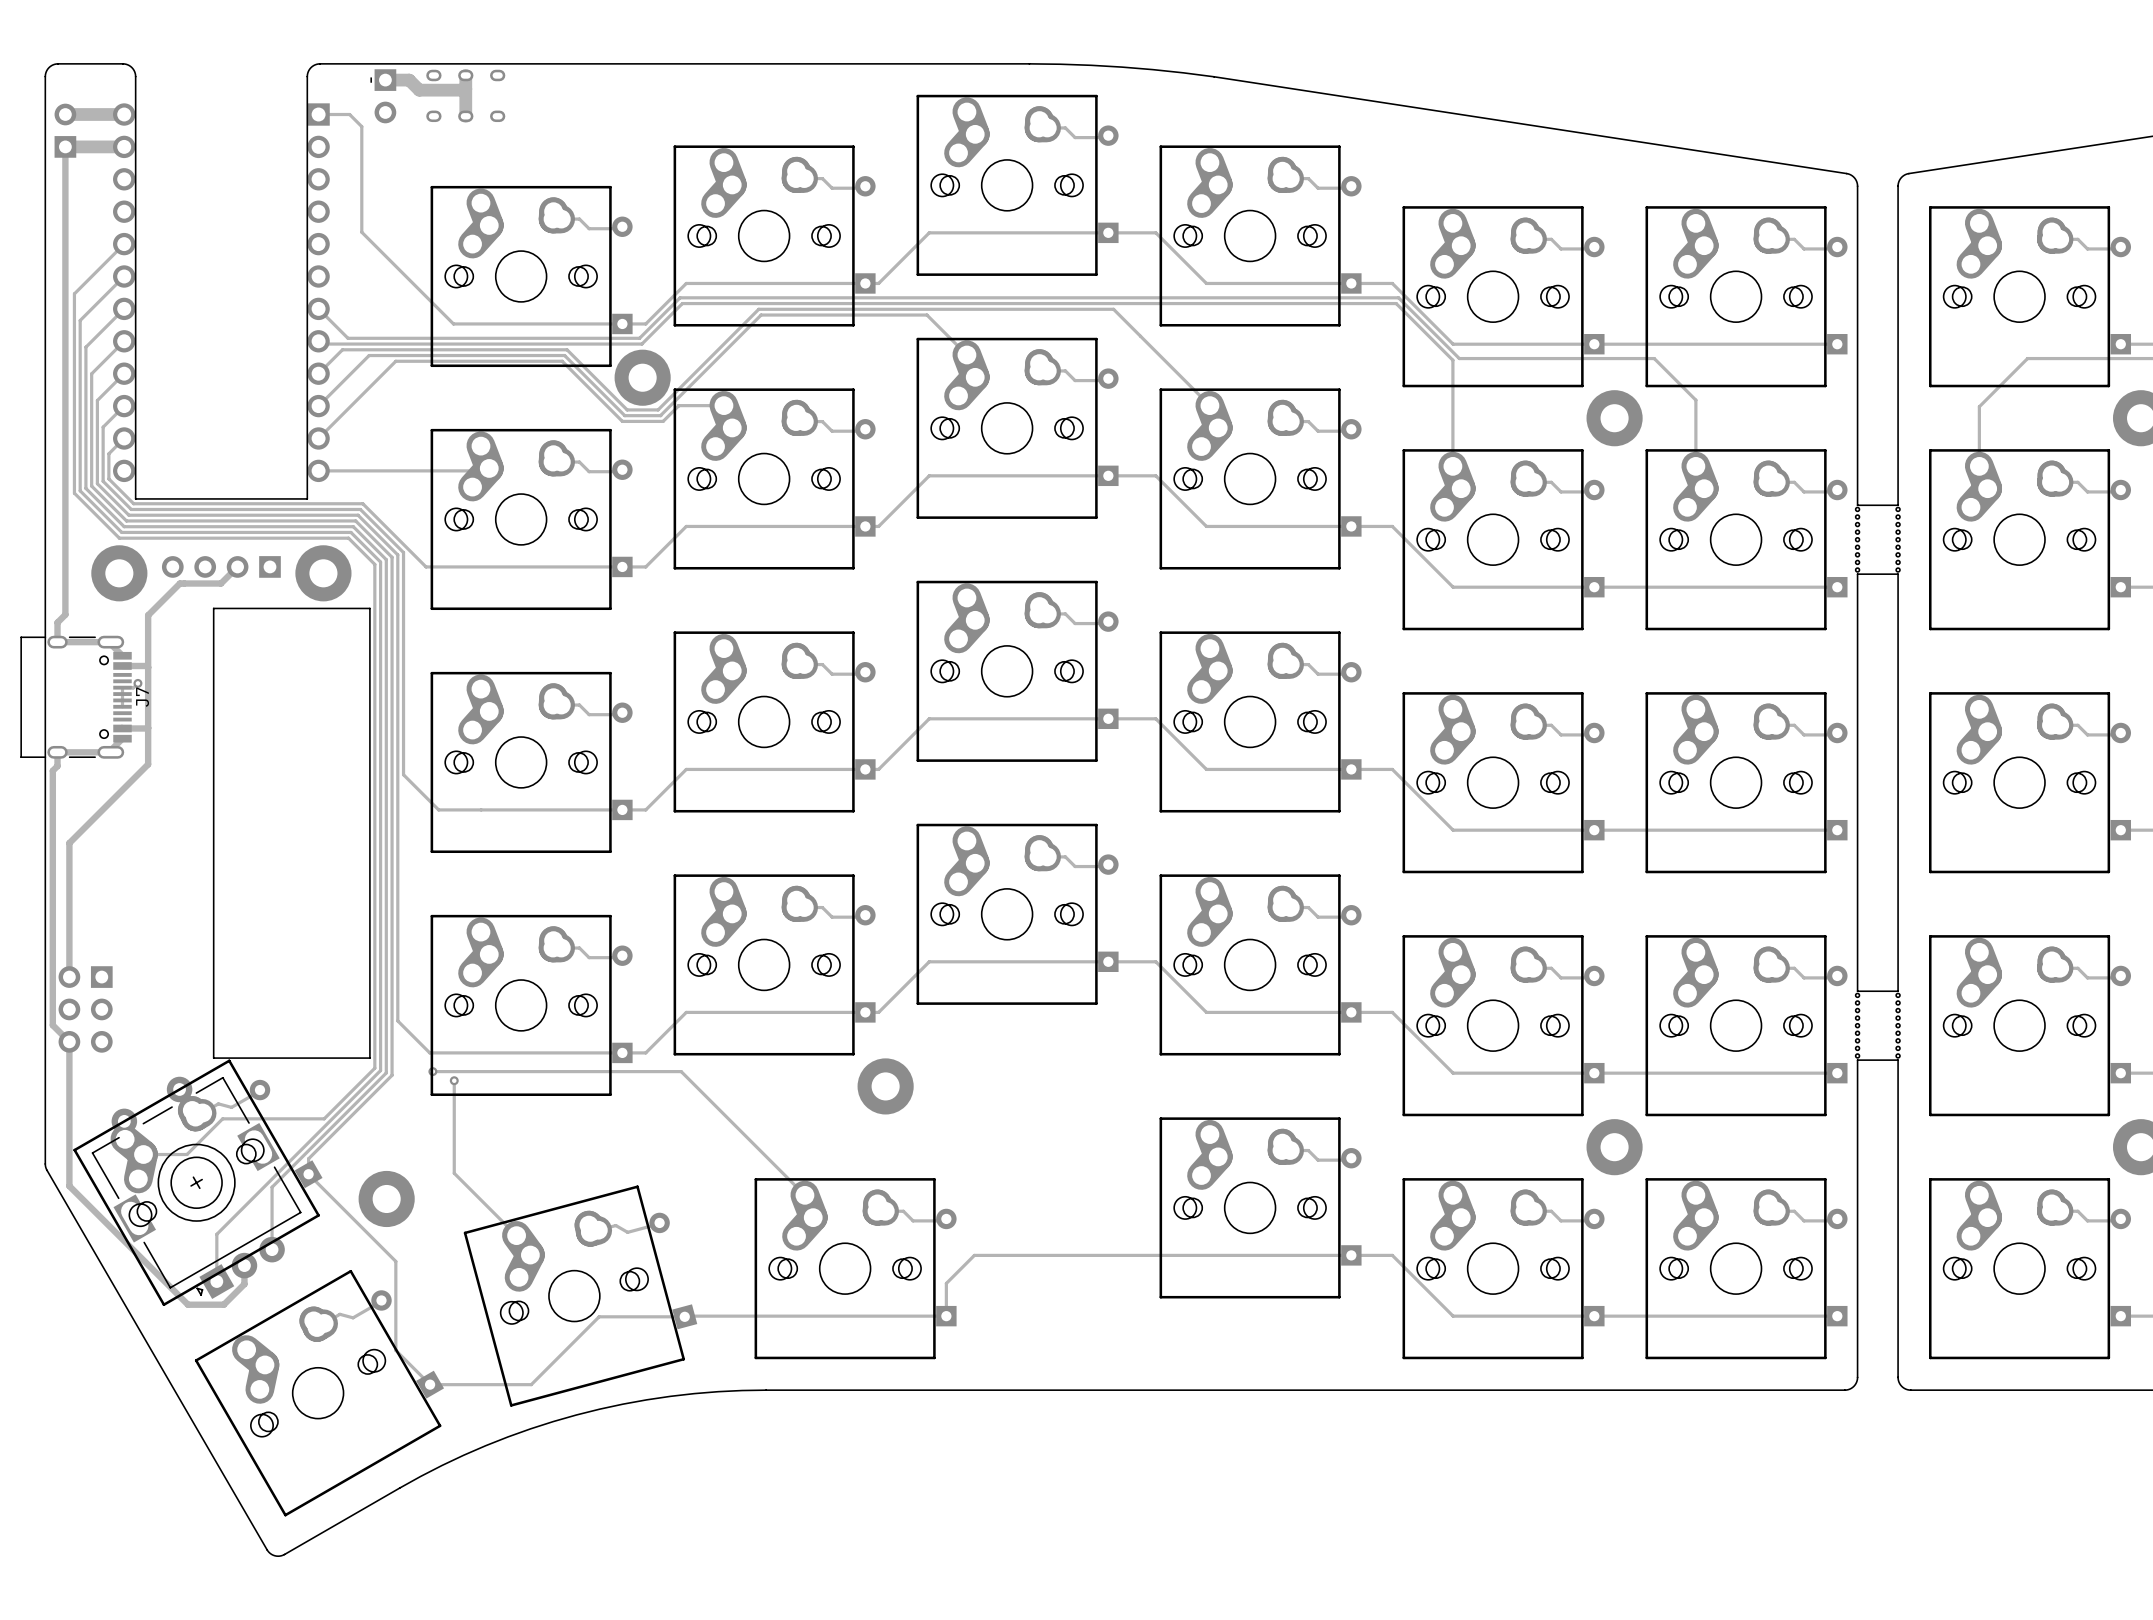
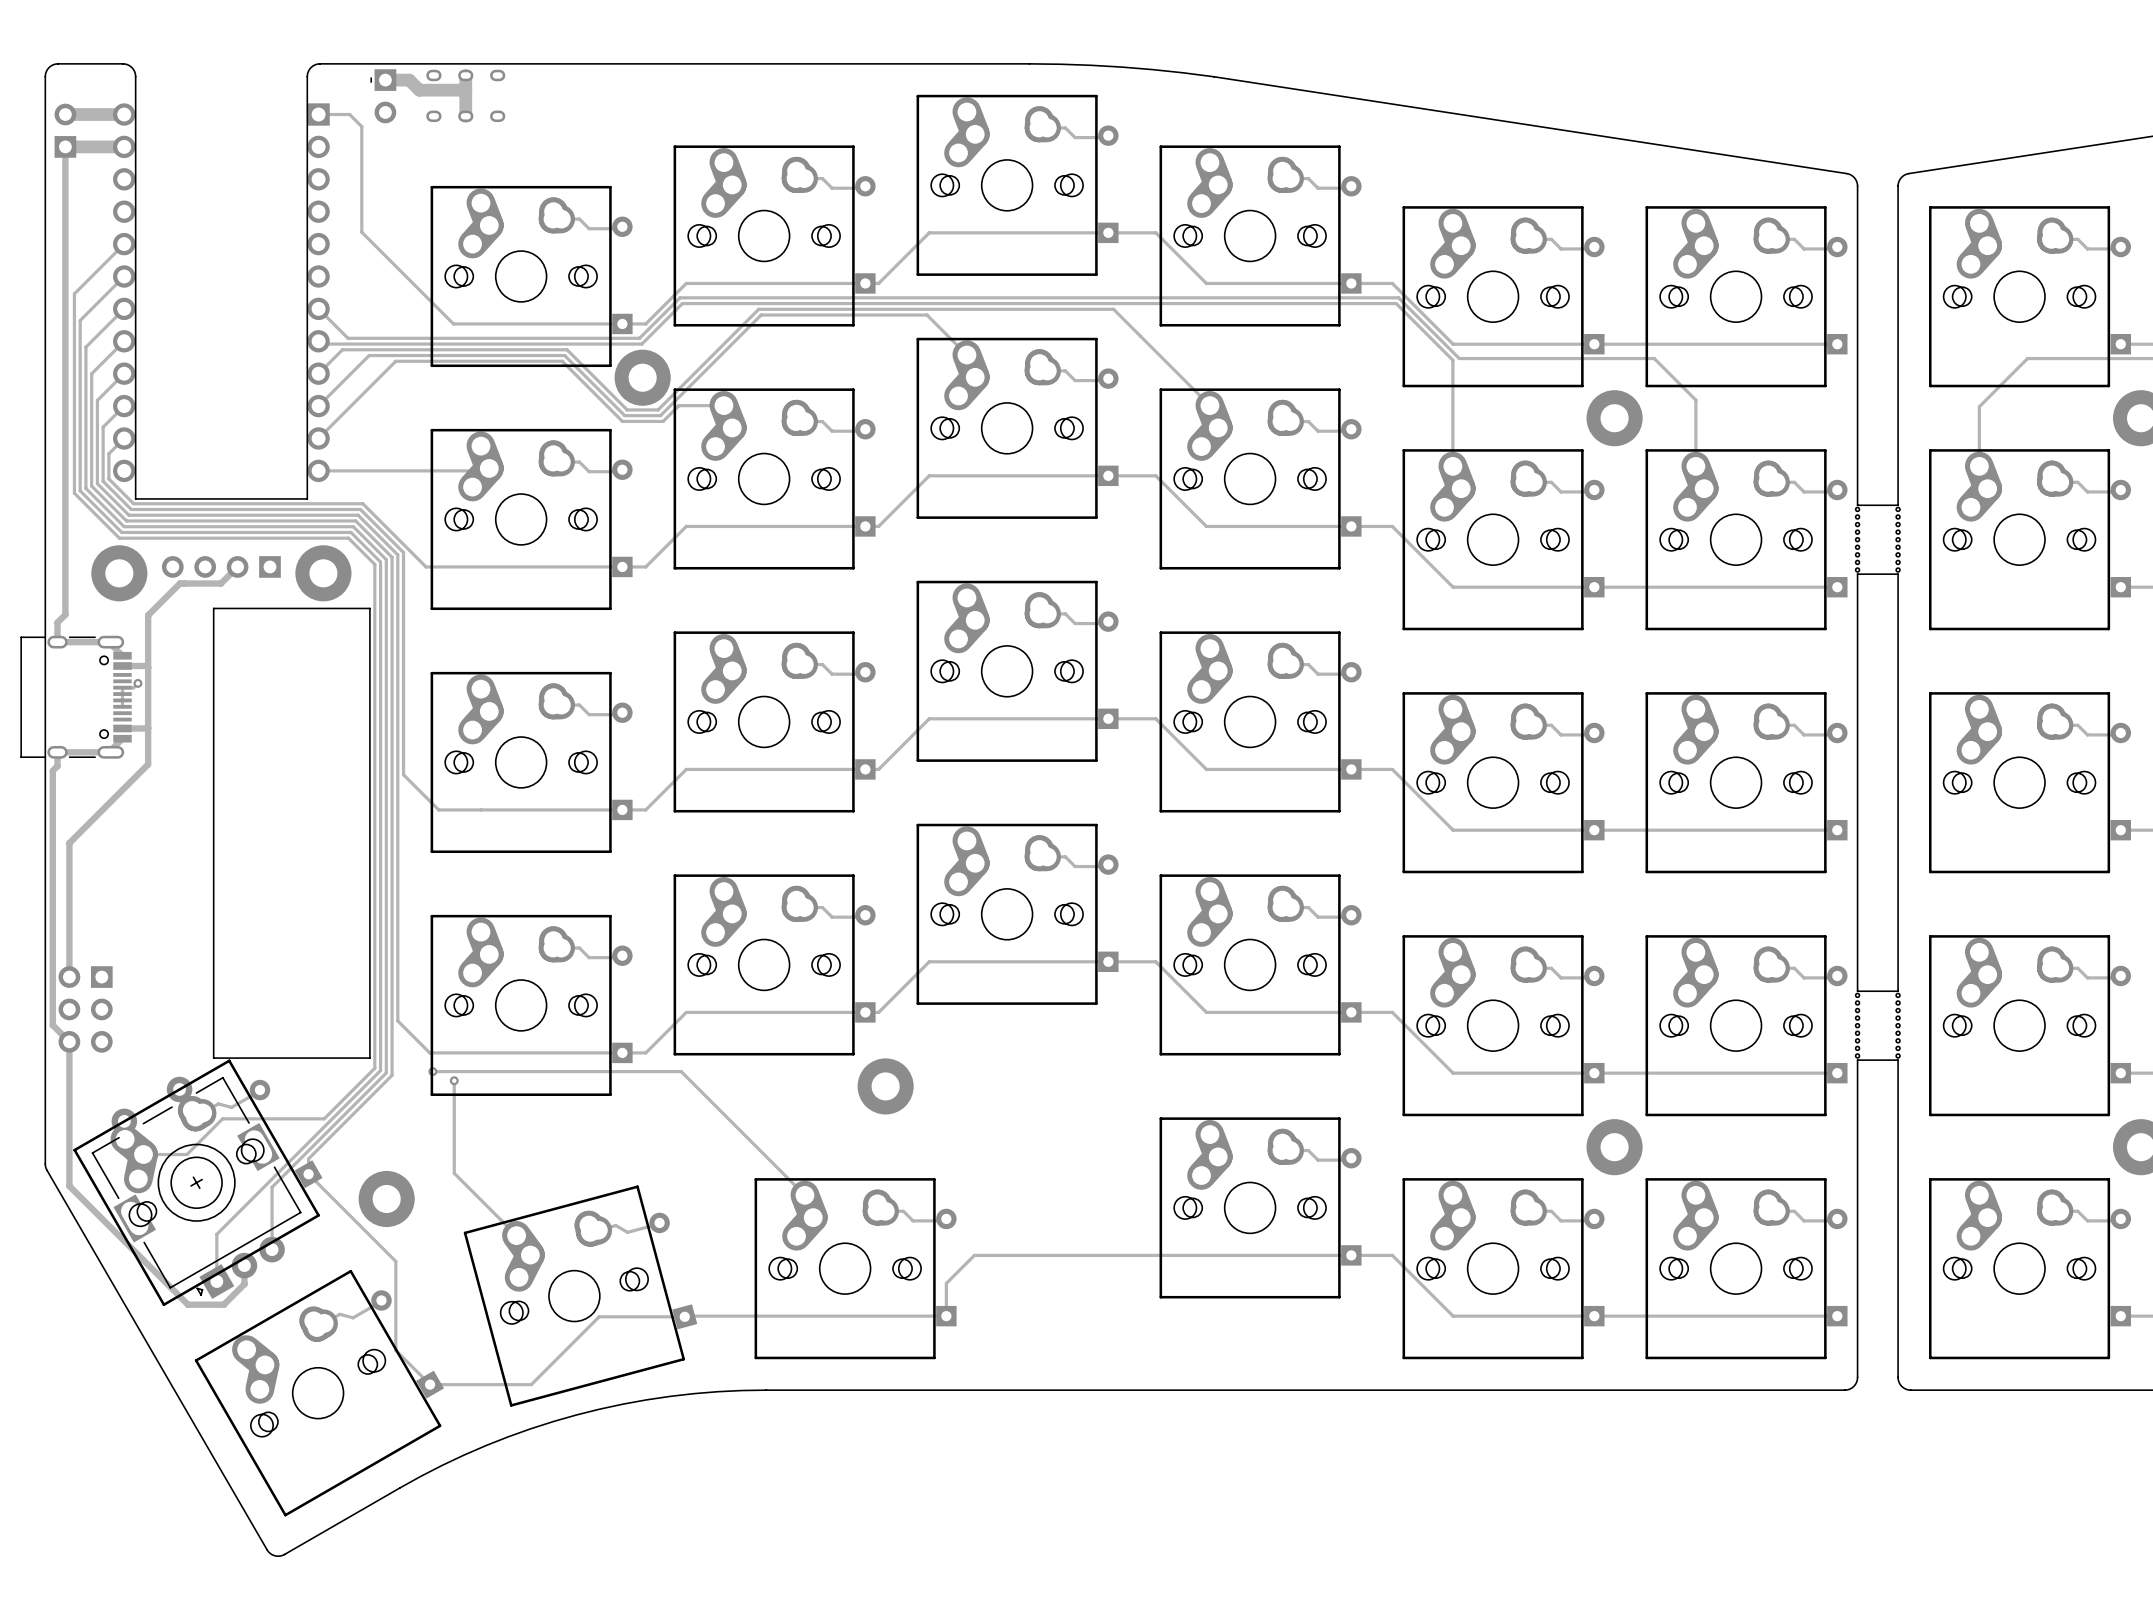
J7 name: J7 (142, 697) -> none

